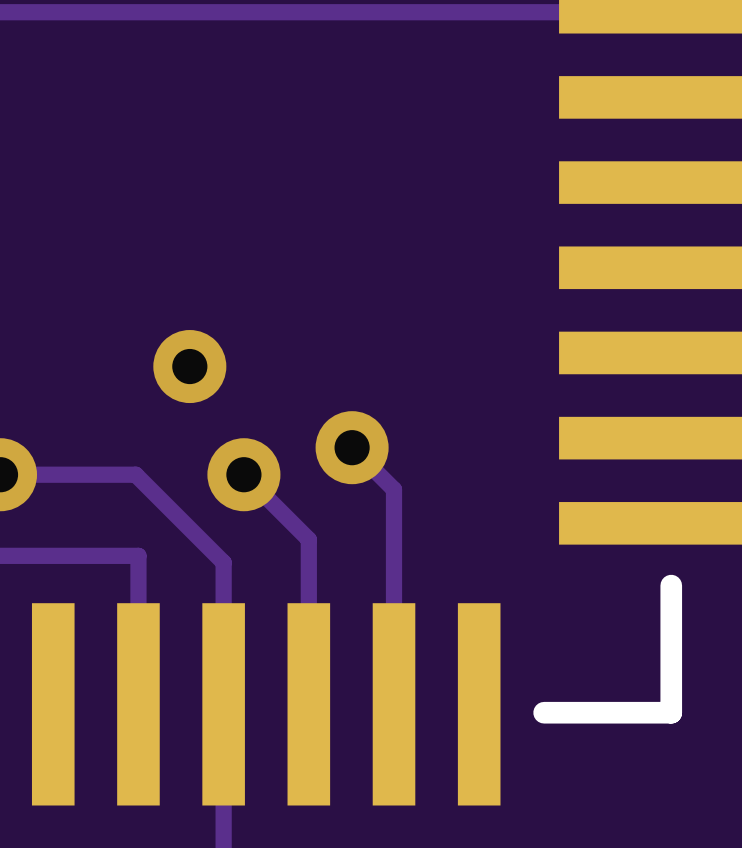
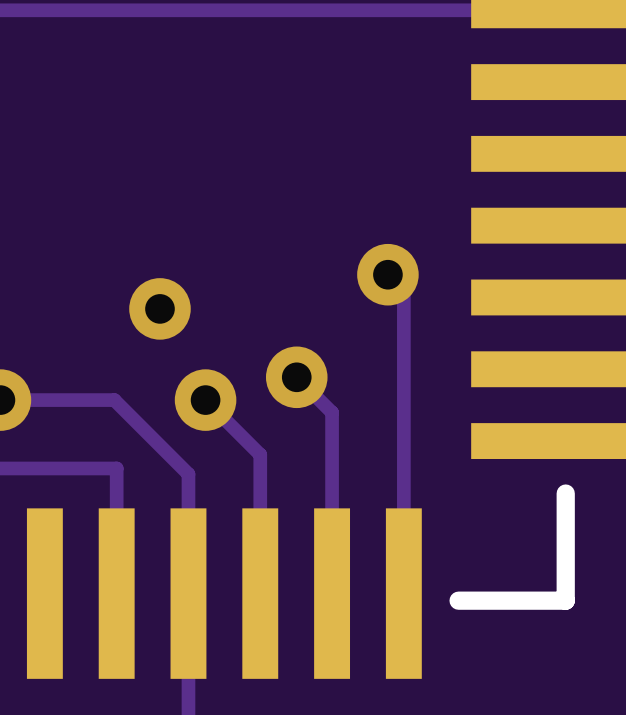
track: none -> (387, 274) (403, 290) (403, 593)
via: none -> (387, 274)

